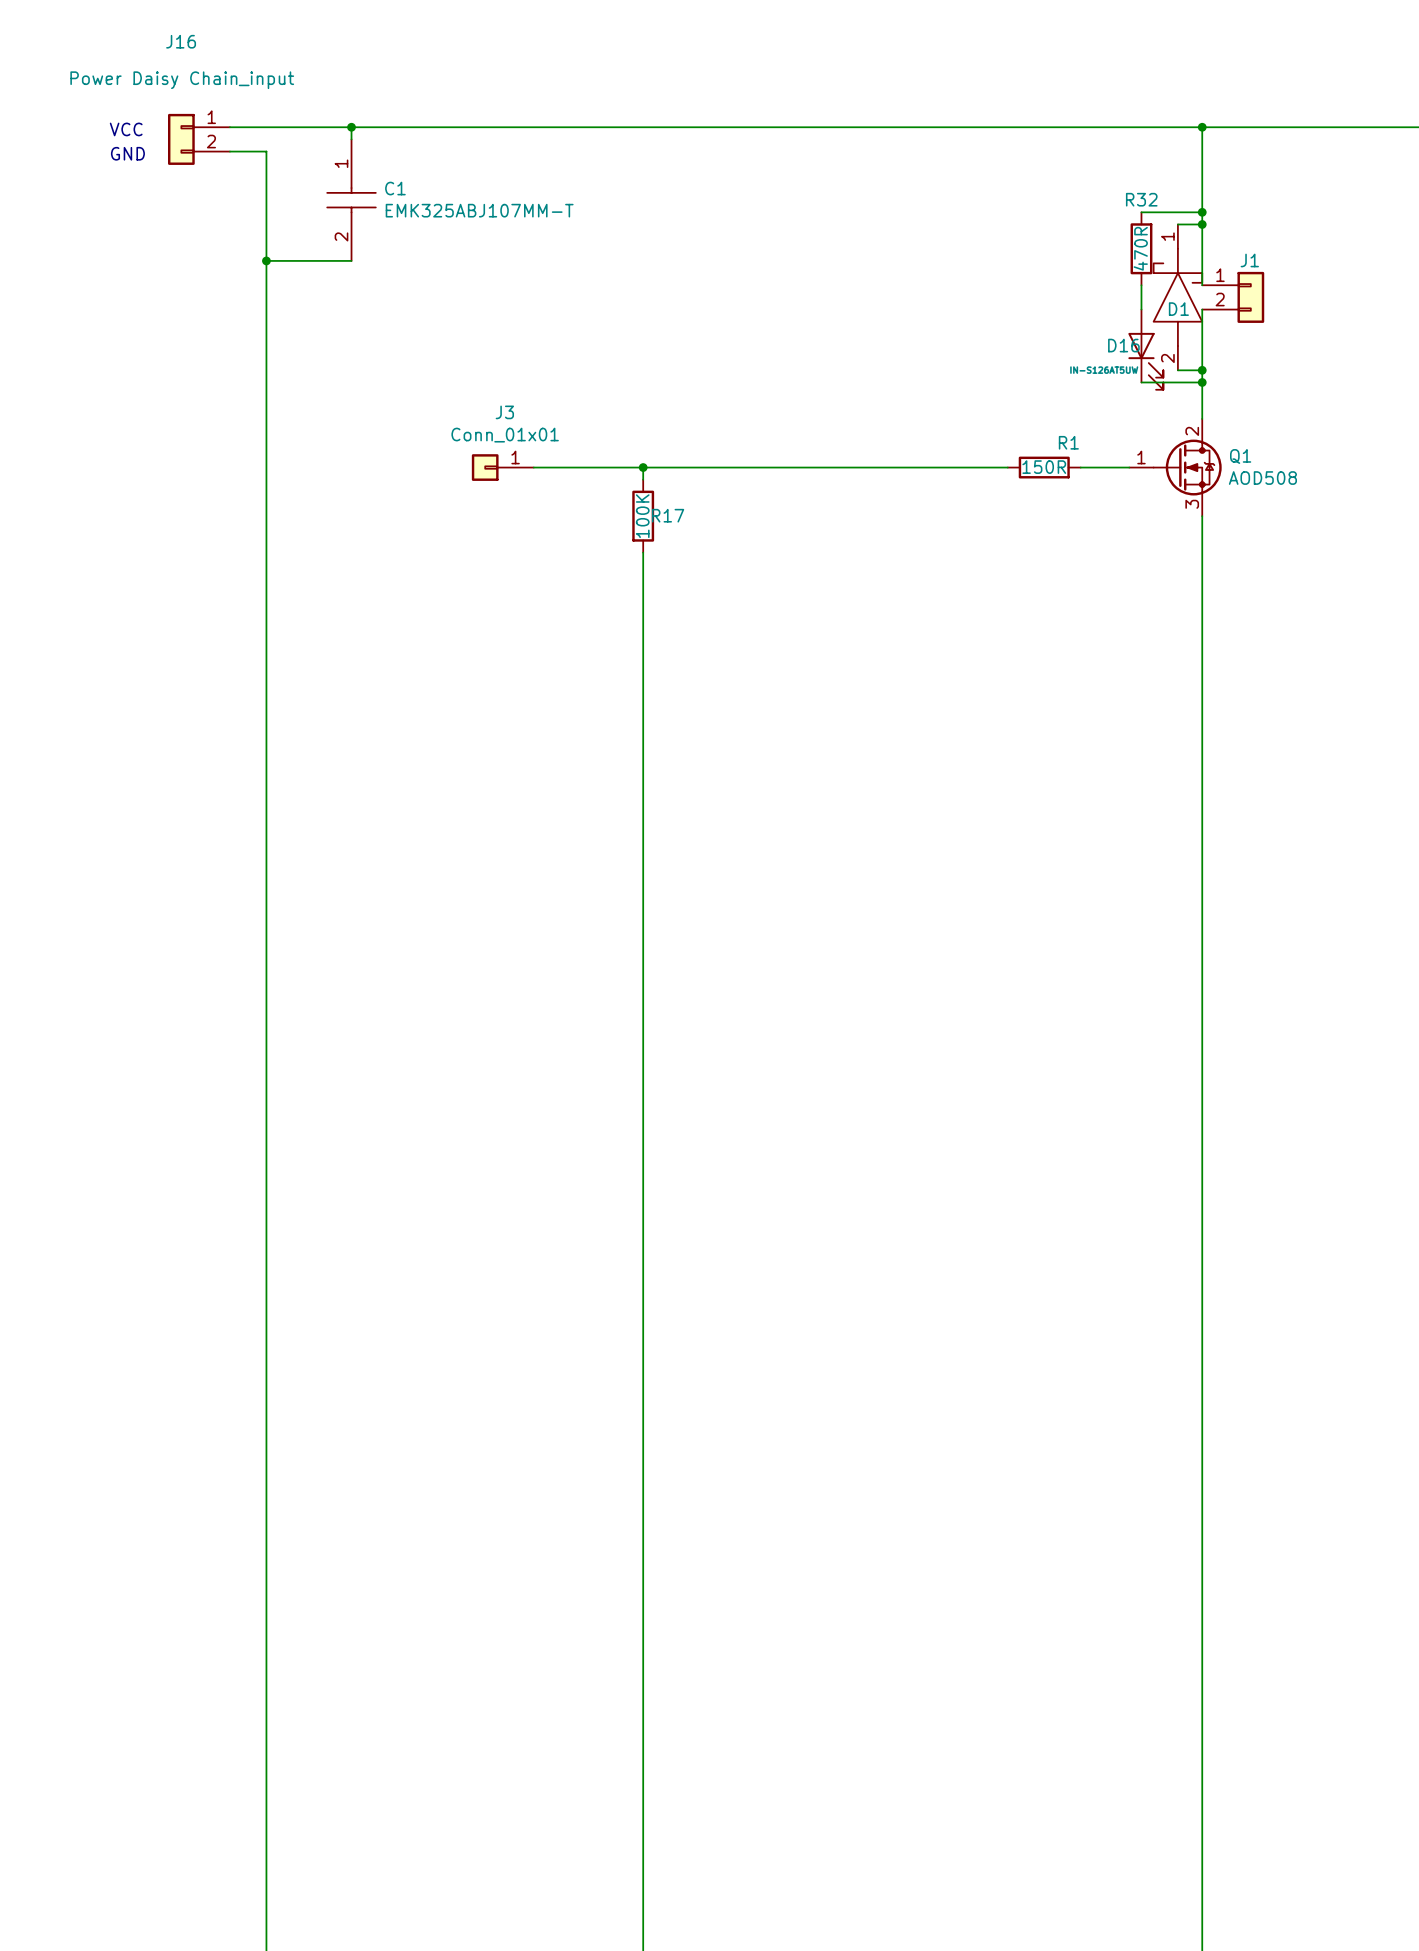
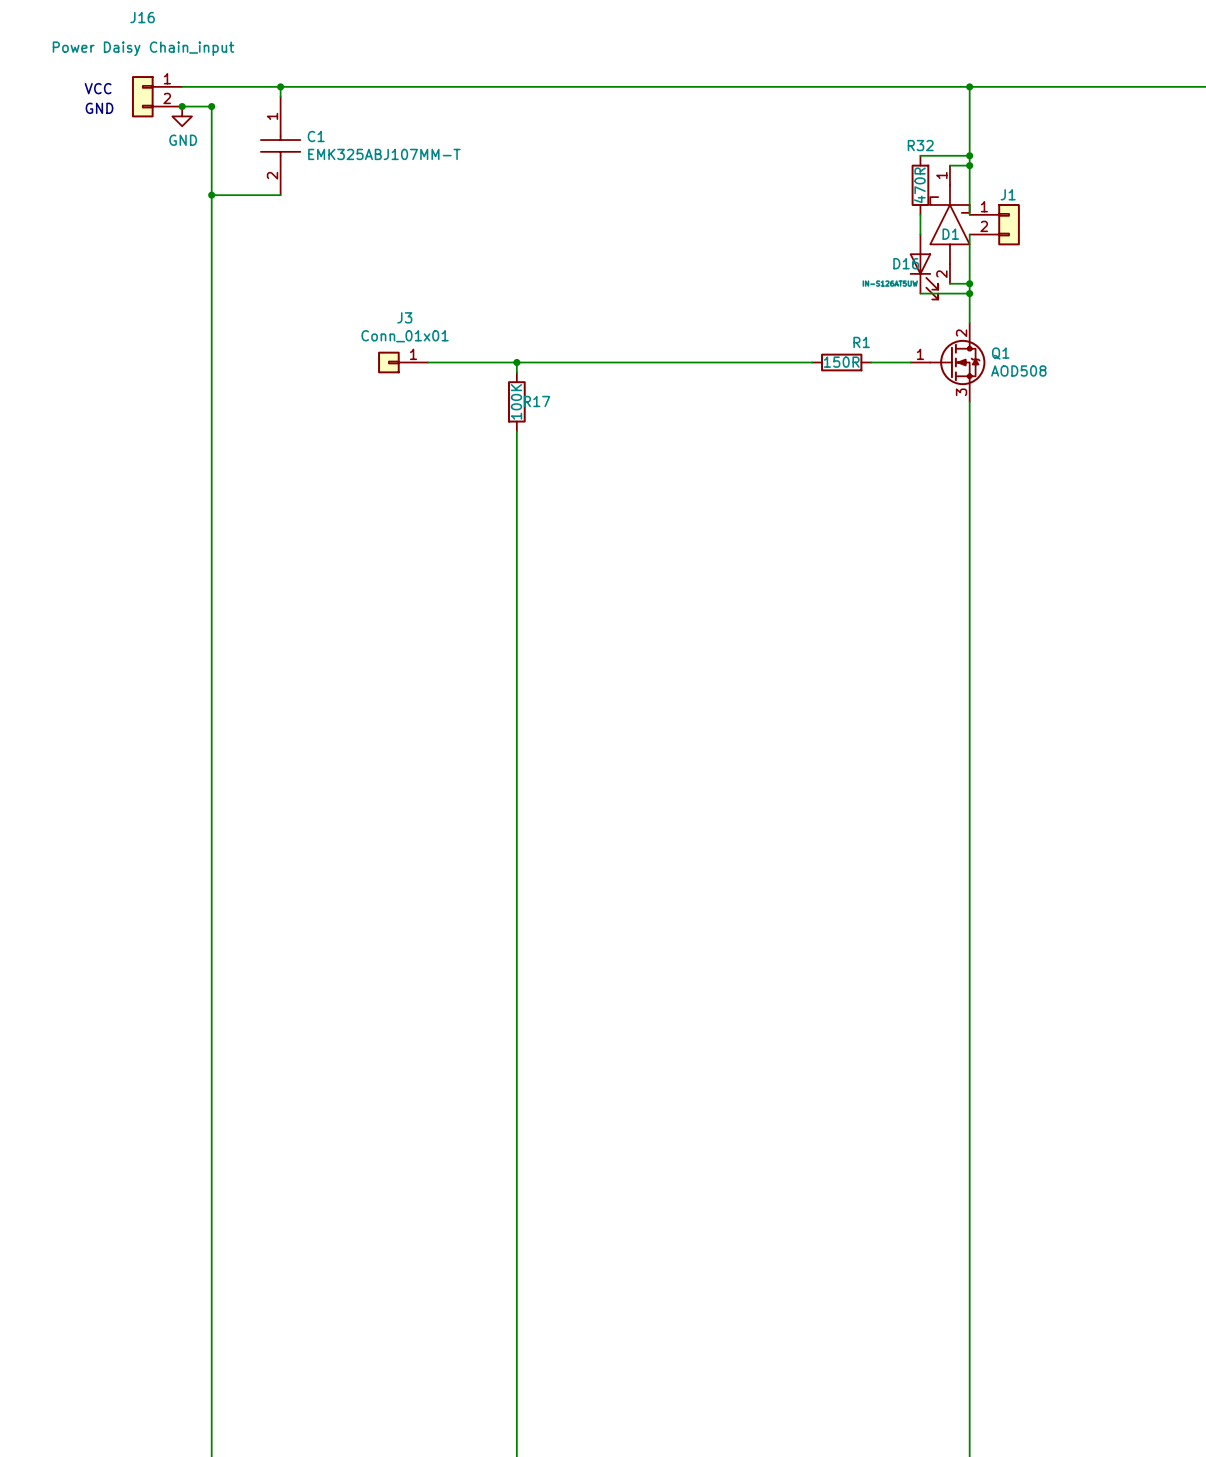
junction: none -> (182, 106)
junction: none -> (211, 106)
power symbol: none -> GND (182, 116)

